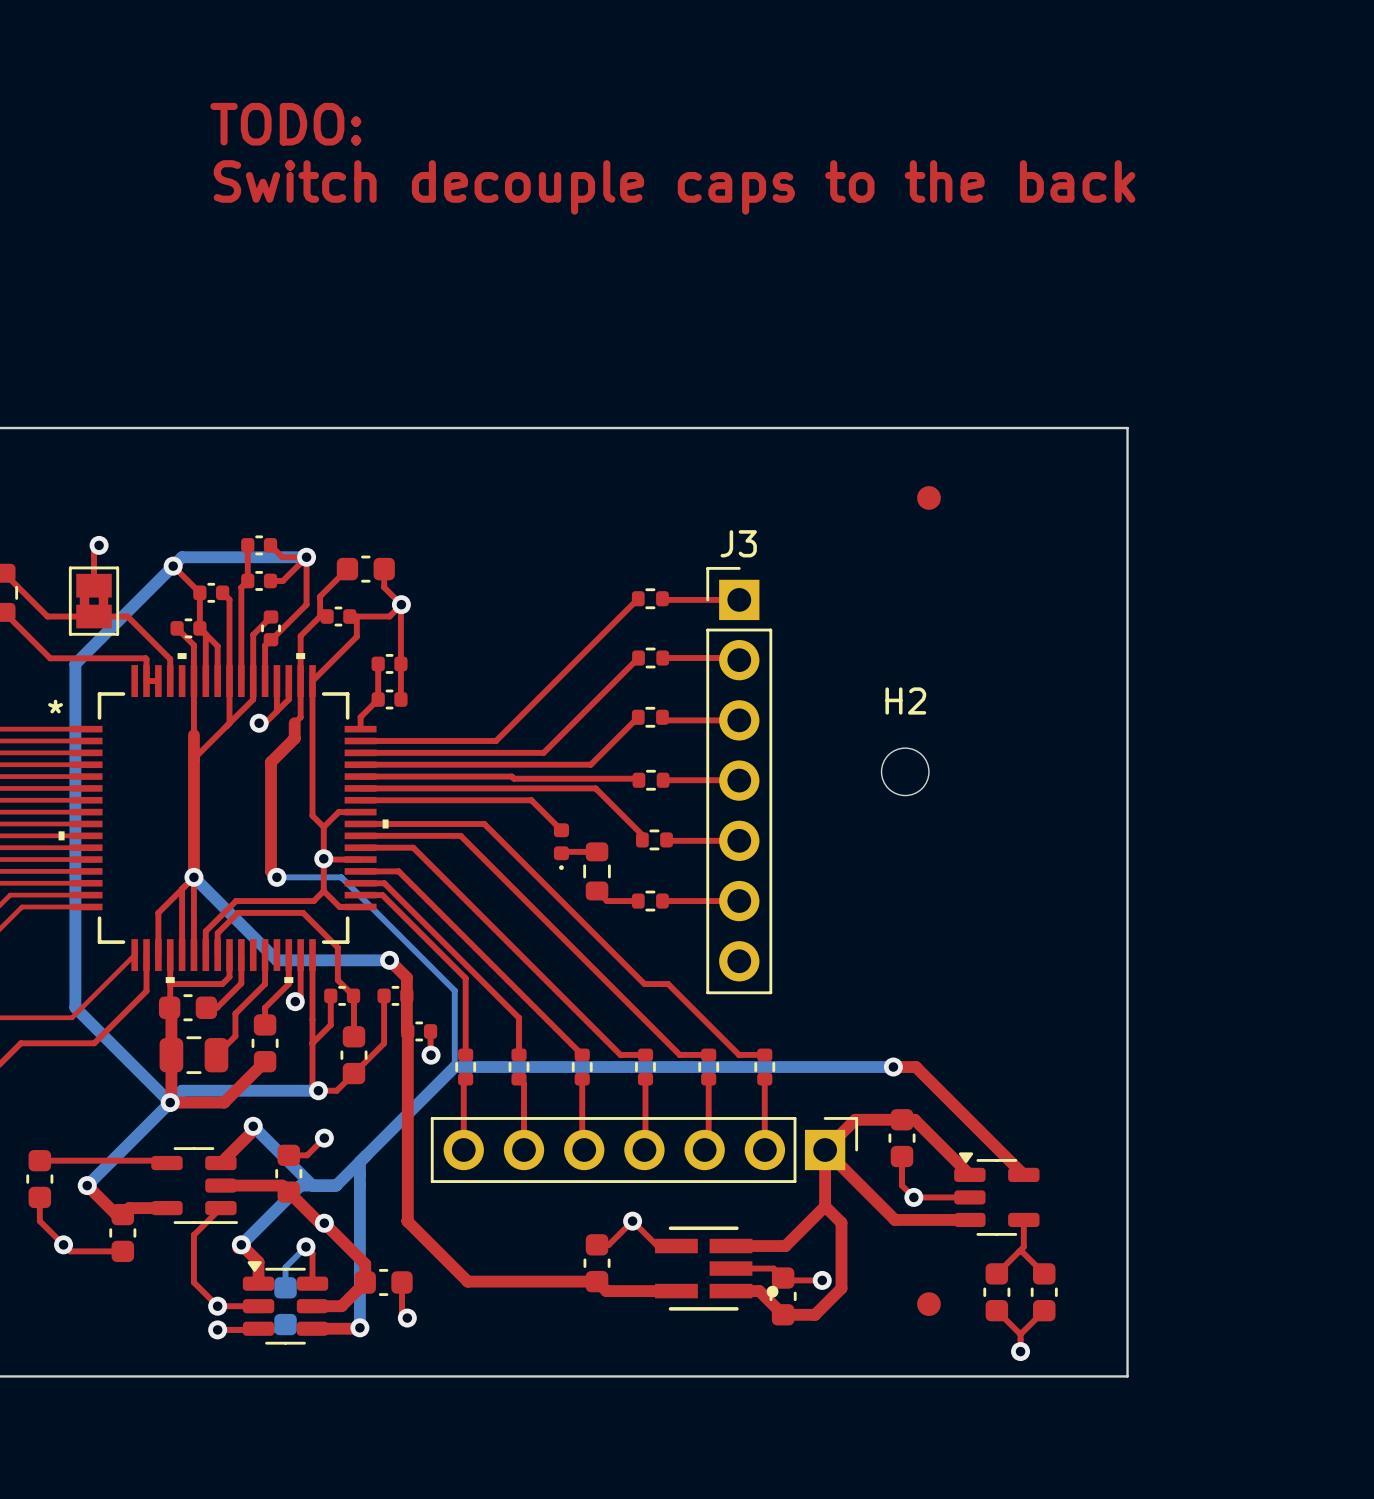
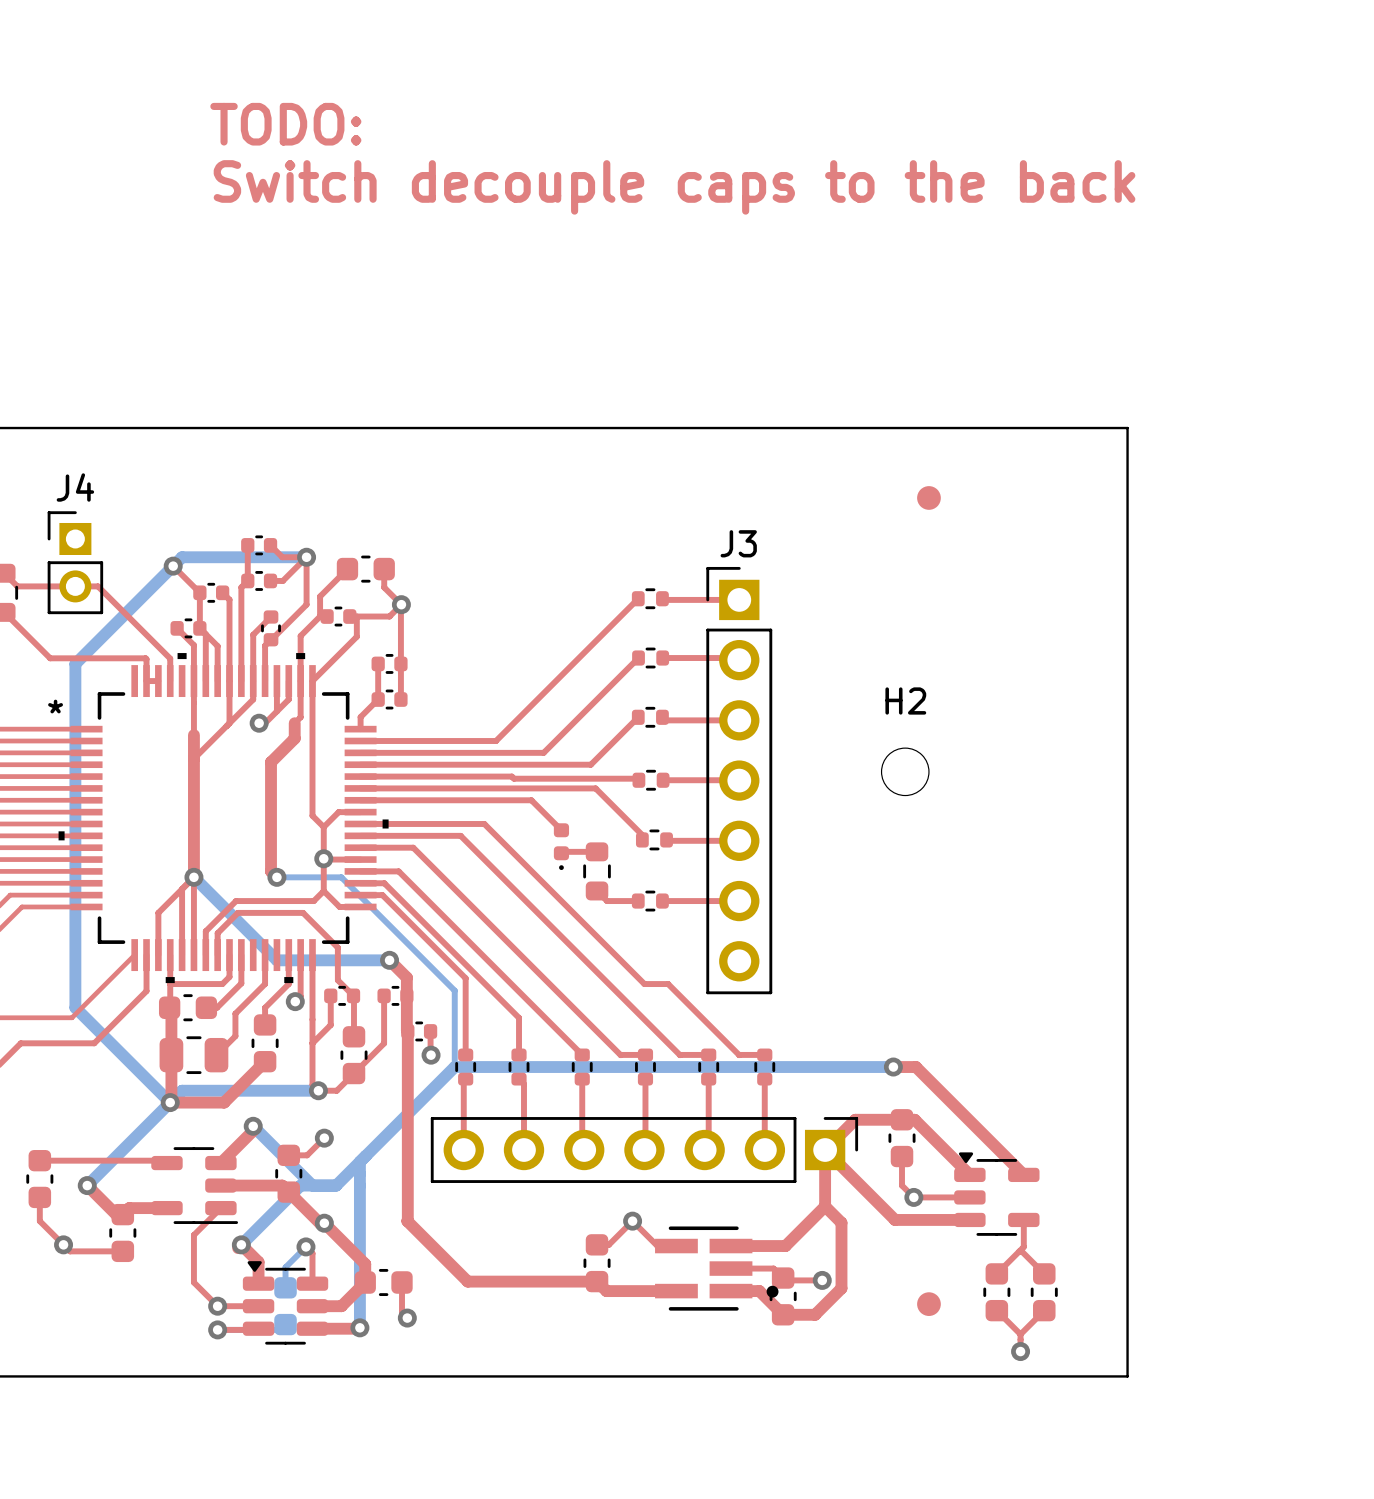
top track: (99, 545) (94, 550) (94, 585) -> none
via: (99, 545) -> none
J4: none -> (75, 562)
top track: (17, 586) (47, 616) (127, 616) (170, 659) -> (17, 586) (98, 586) (170, 659)
part: (94, 601) -> none

